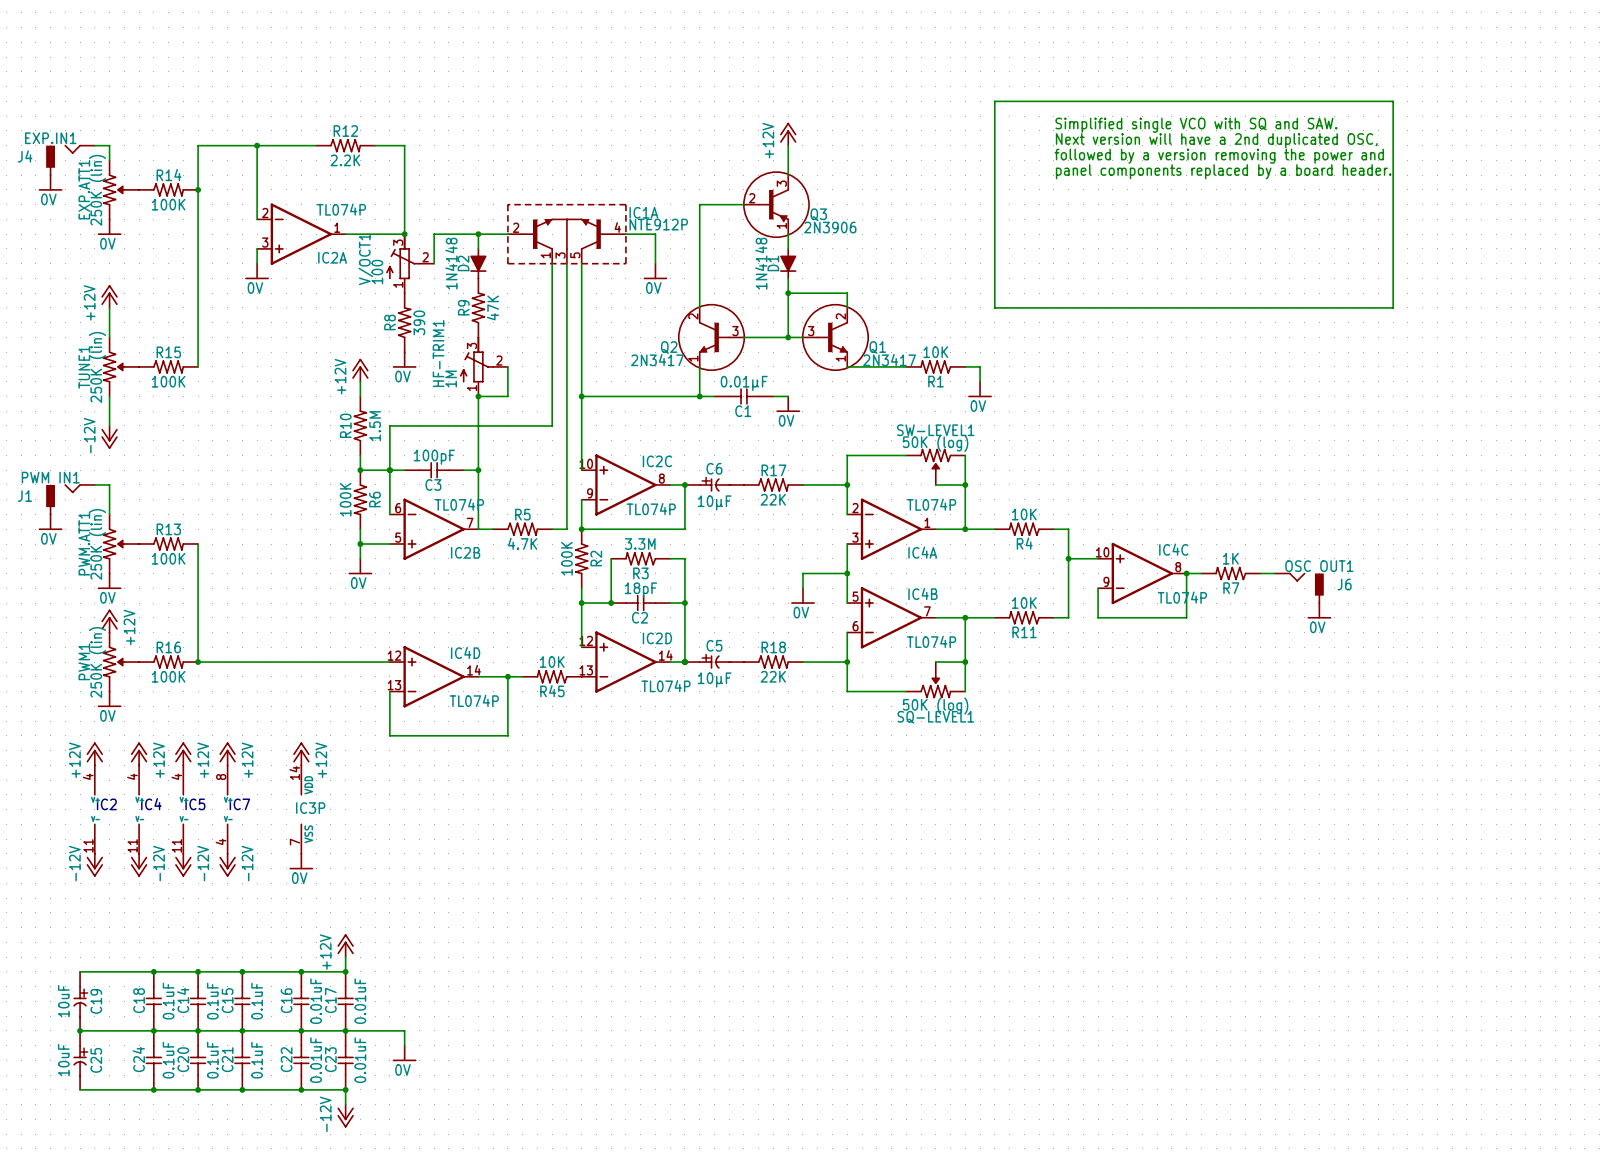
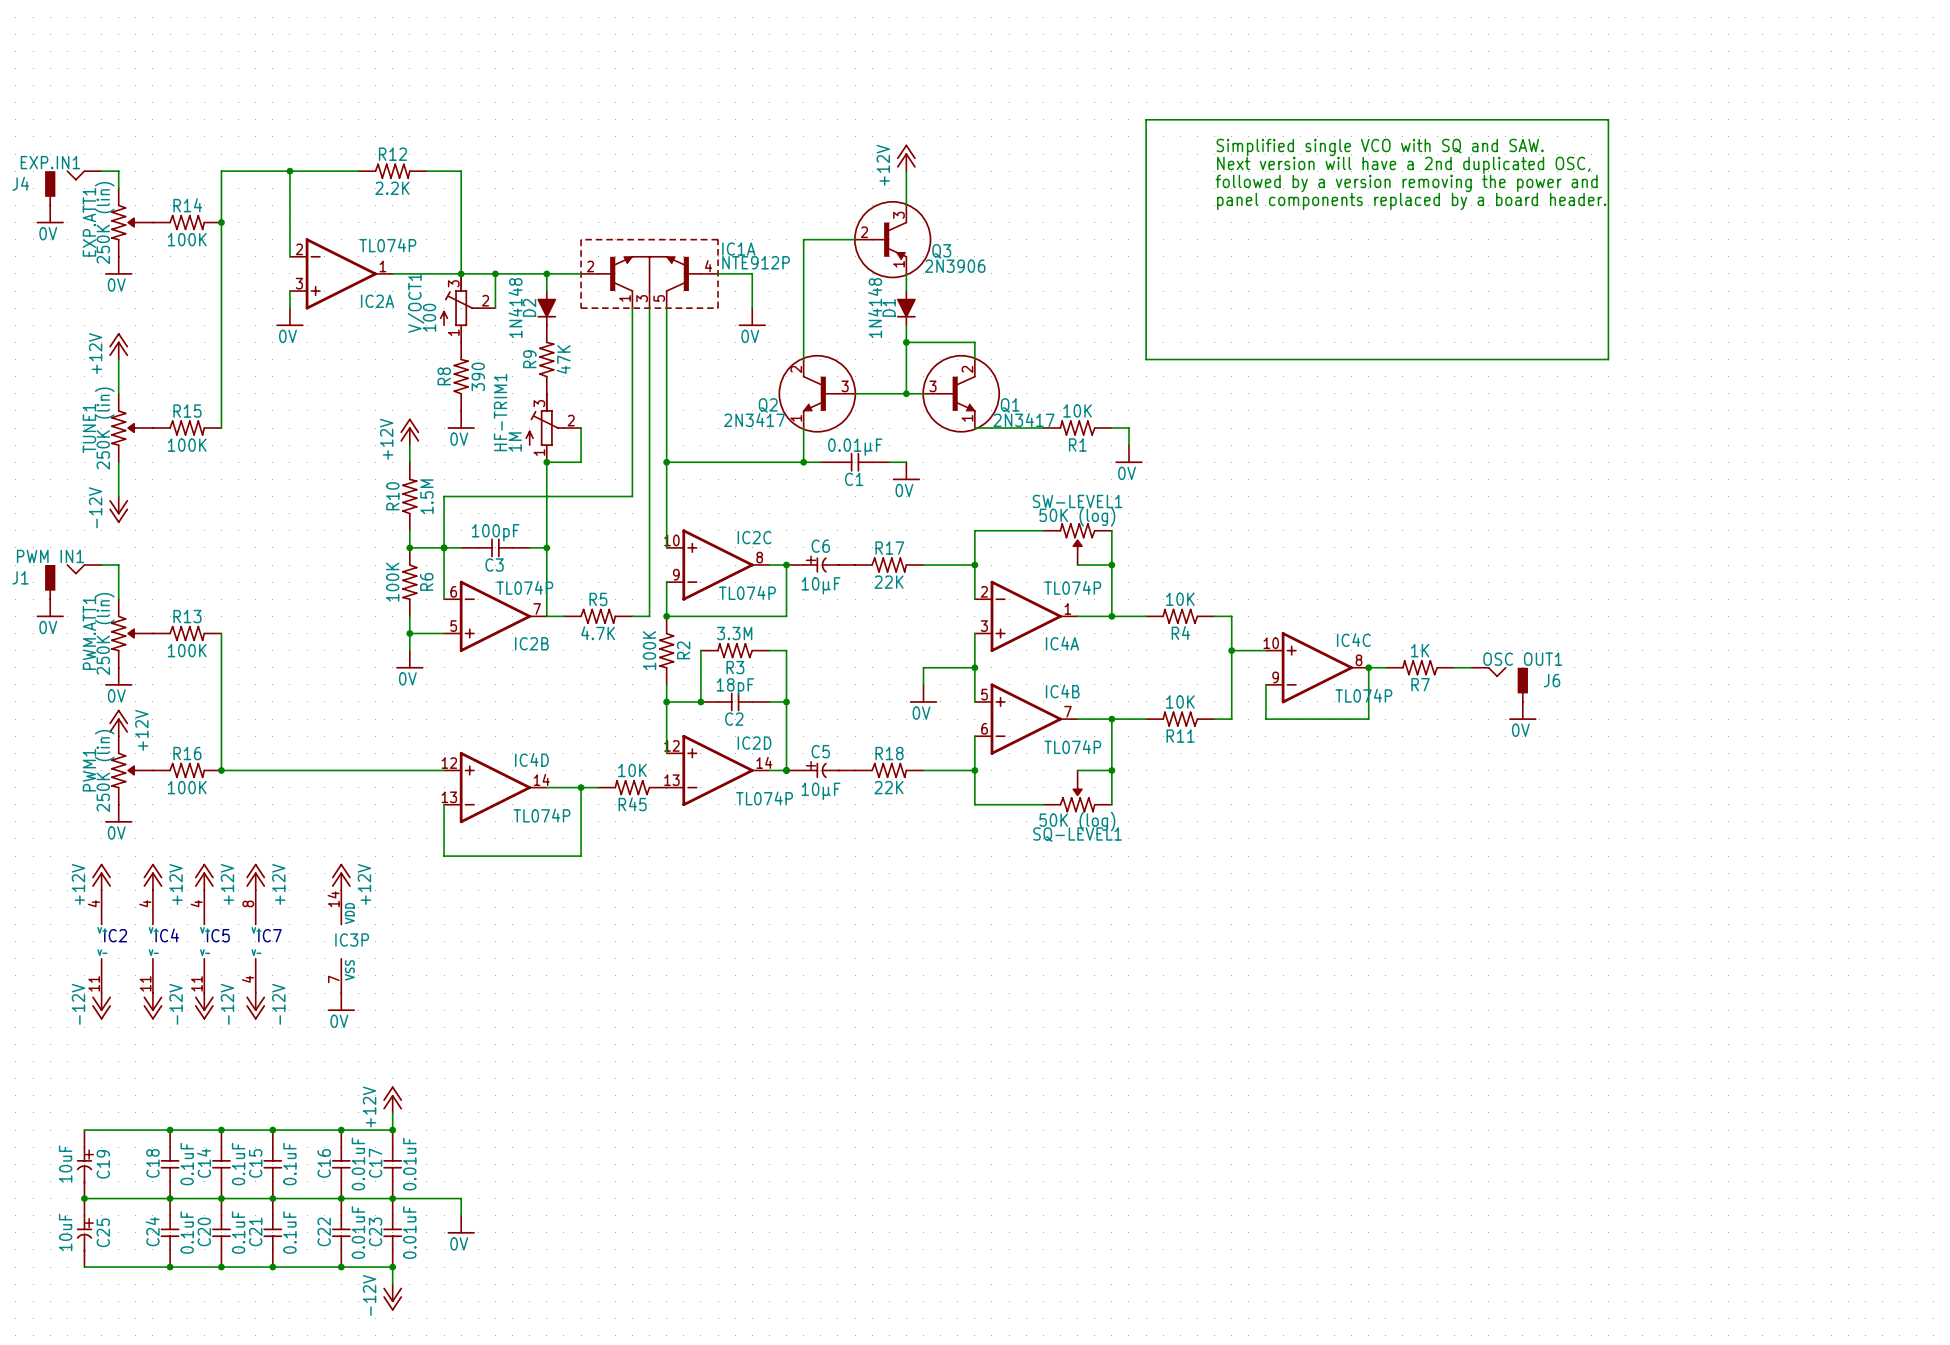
wire: none -> (461, 273) (495, 273)
junction: none -> (495, 273)

